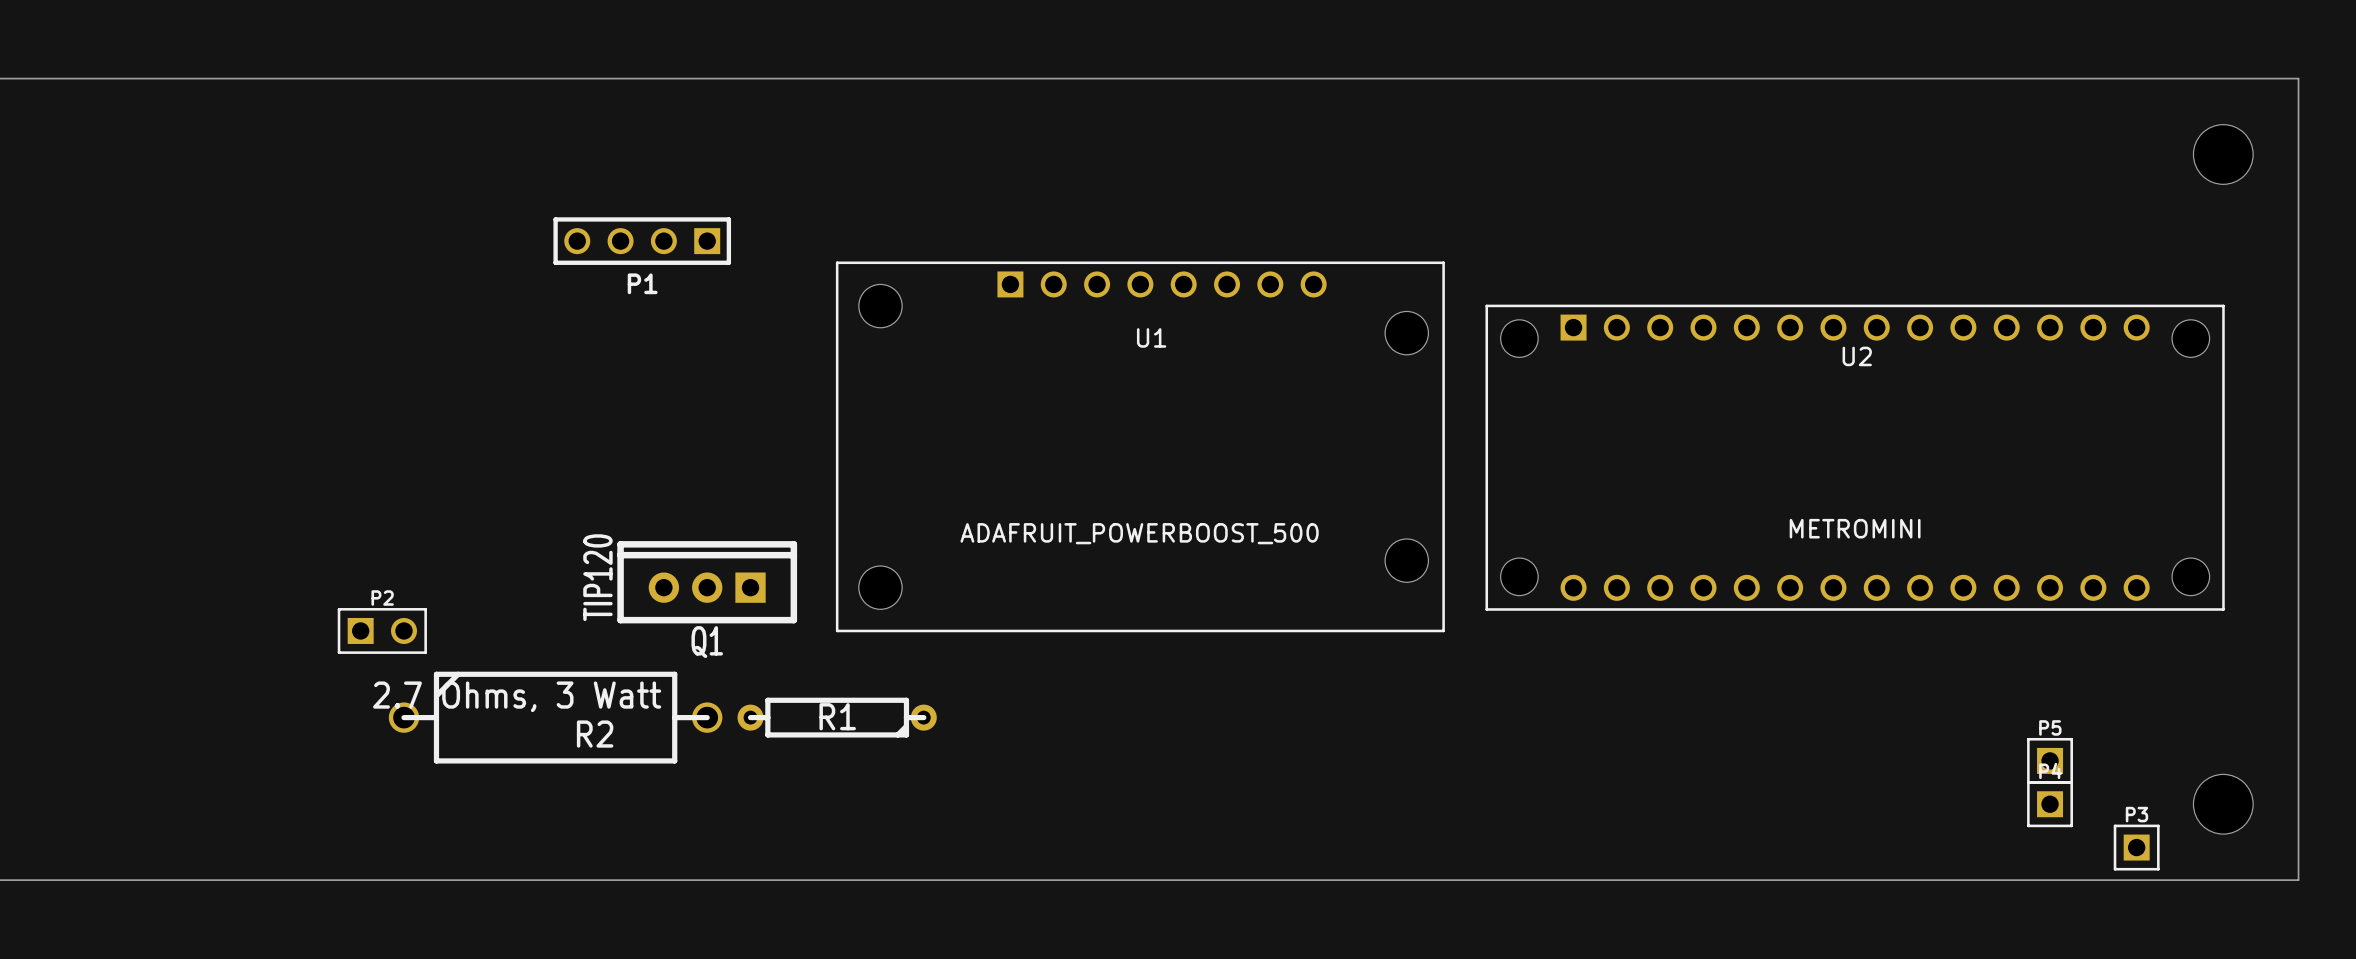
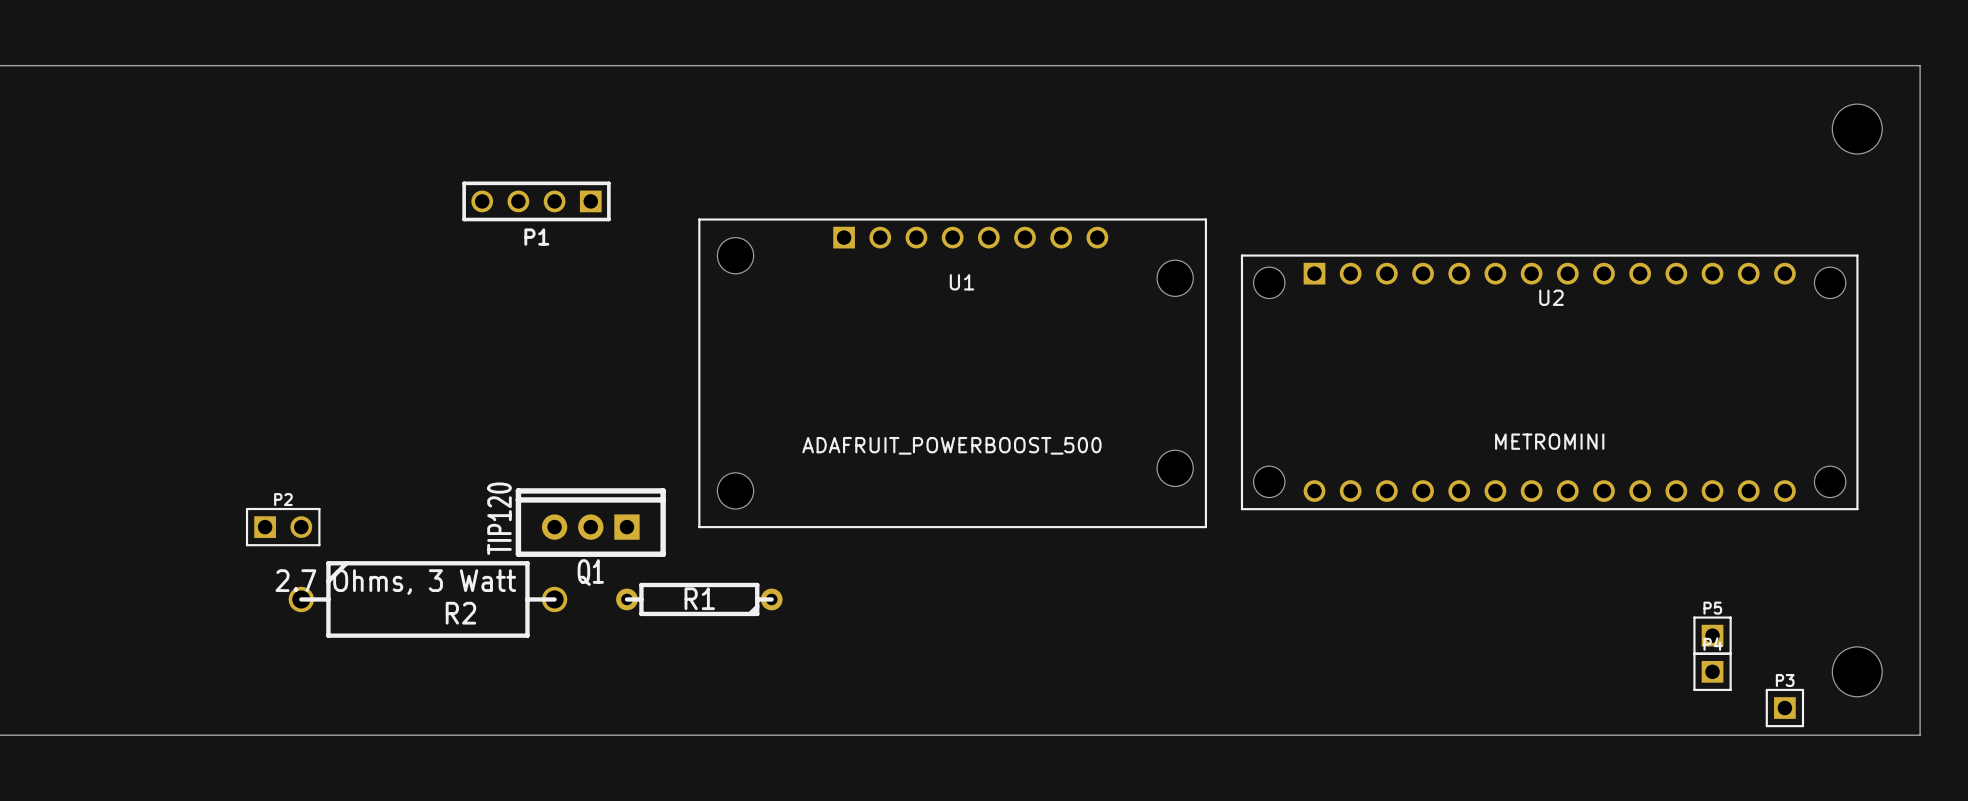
Q1 position: (707, 582) -> (590, 522)
P2 position: (382, 630) -> (283, 527)
R2 position: (555, 717) -> (427, 599)

